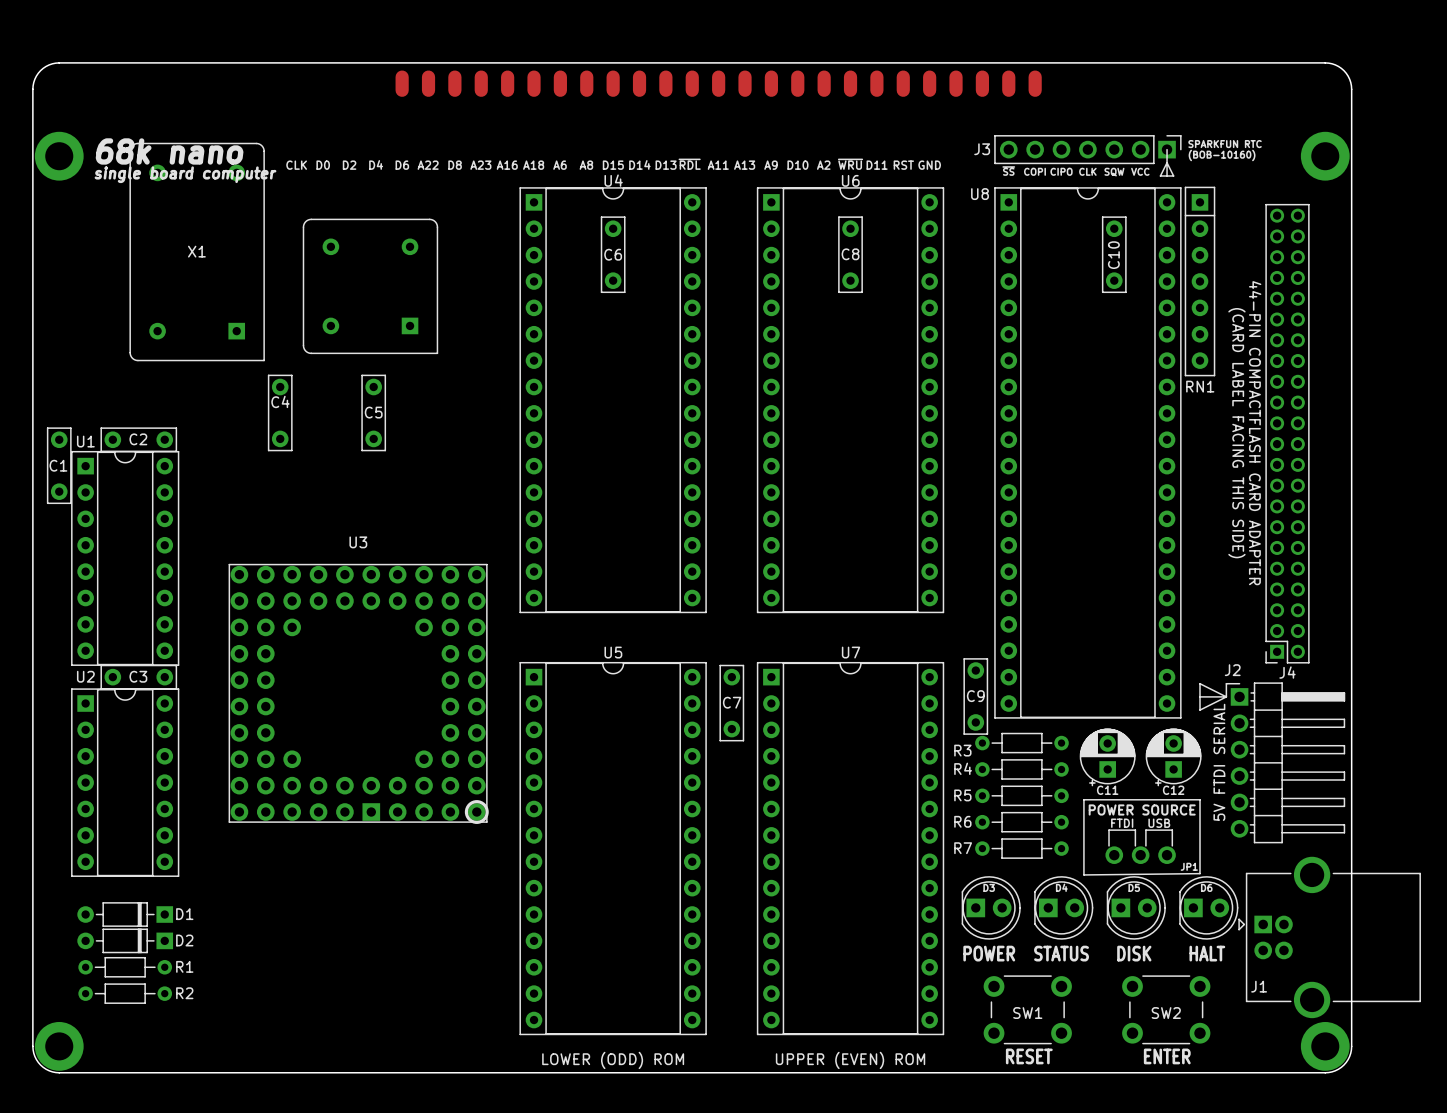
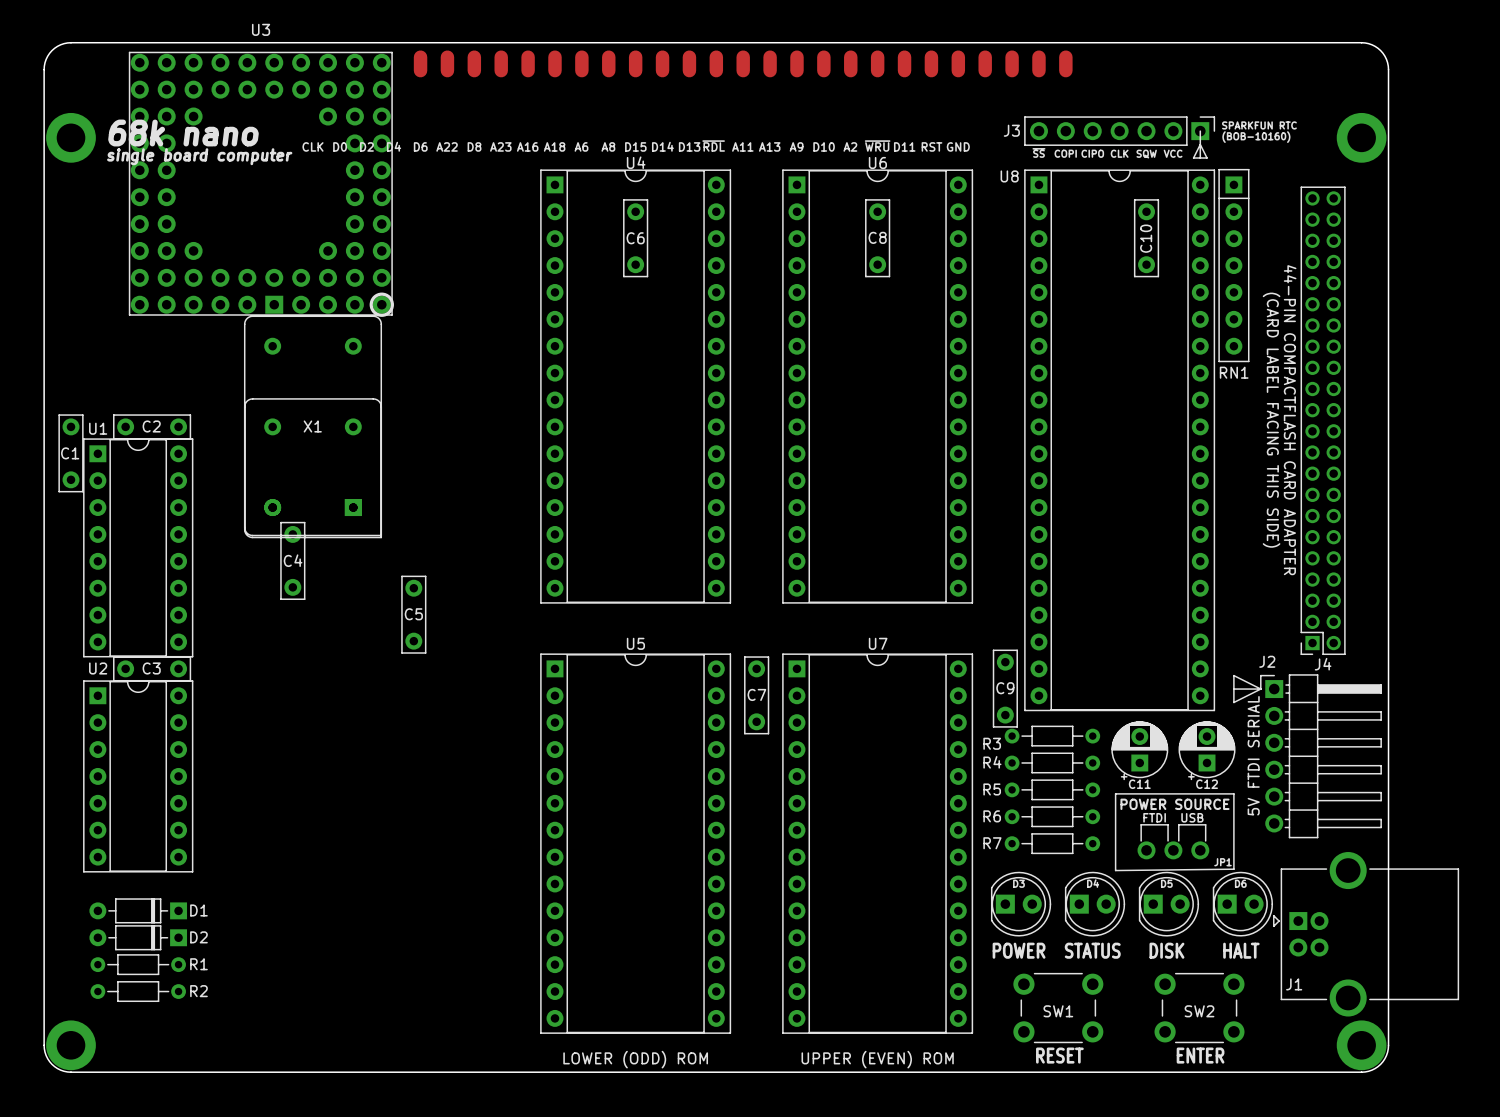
X1 position: (197, 252) -> (313, 426)
part position: (370, 286) -> (313, 467)
C4 name position: C4 (280, 401) -> C4 (293, 560)
C4 position: (280, 412) -> (292, 560)
C5 position: (373, 412) -> (413, 614)
U3 position: (358, 693) -> (261, 184)

